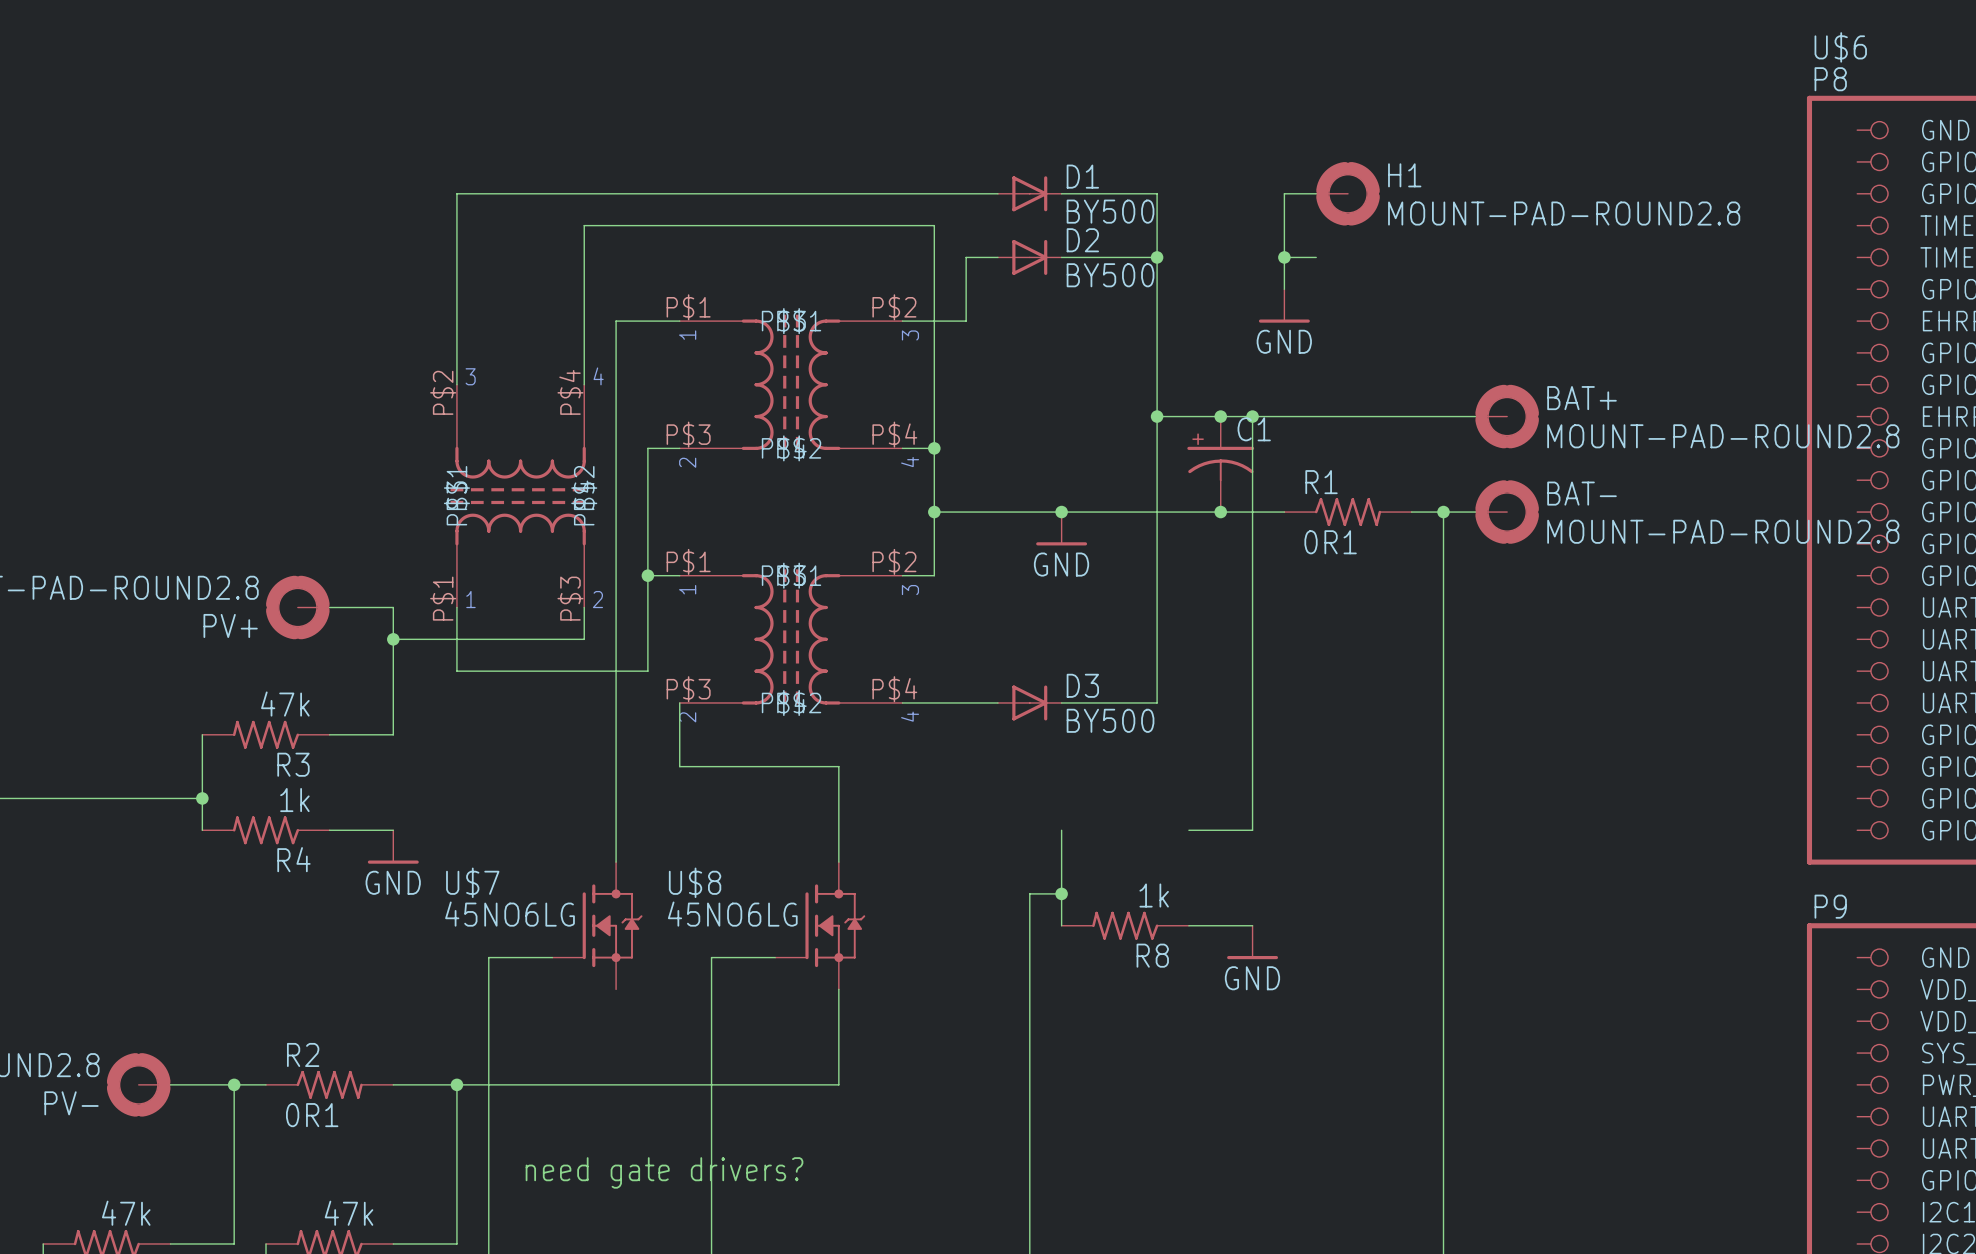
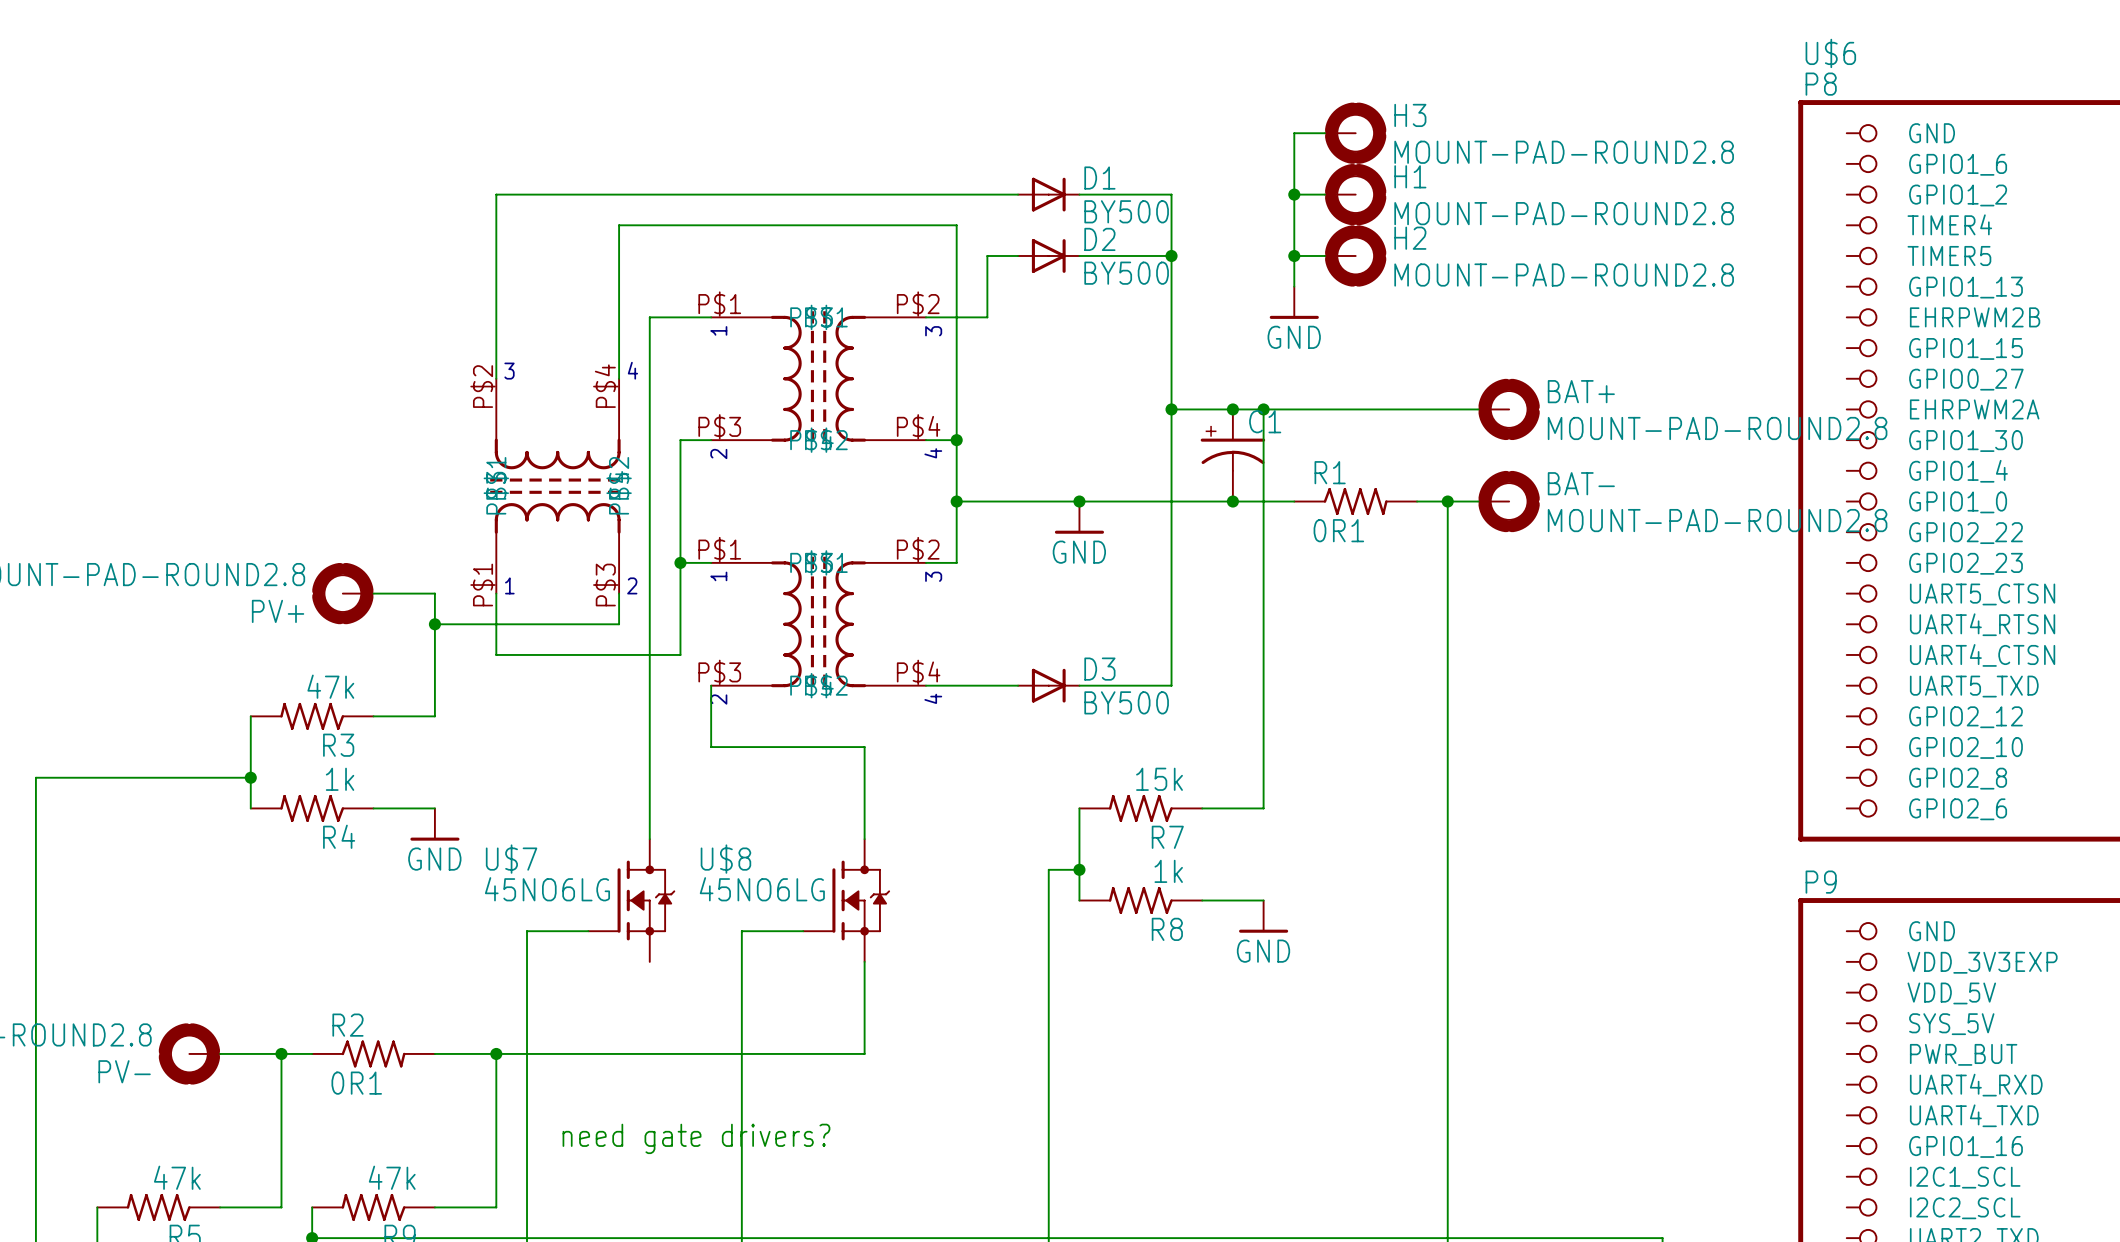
wire: none -> (1324, 133) (1294, 133) (1294, 194)
H3: none -> MOUNT-PAD-ROUND2.8 (1355, 133)
junction: none -> (1294, 194)
H2: none -> MOUNT-PAD-ROUND2.8 (1355, 255)
R7: none -> 15k (1140, 808)

